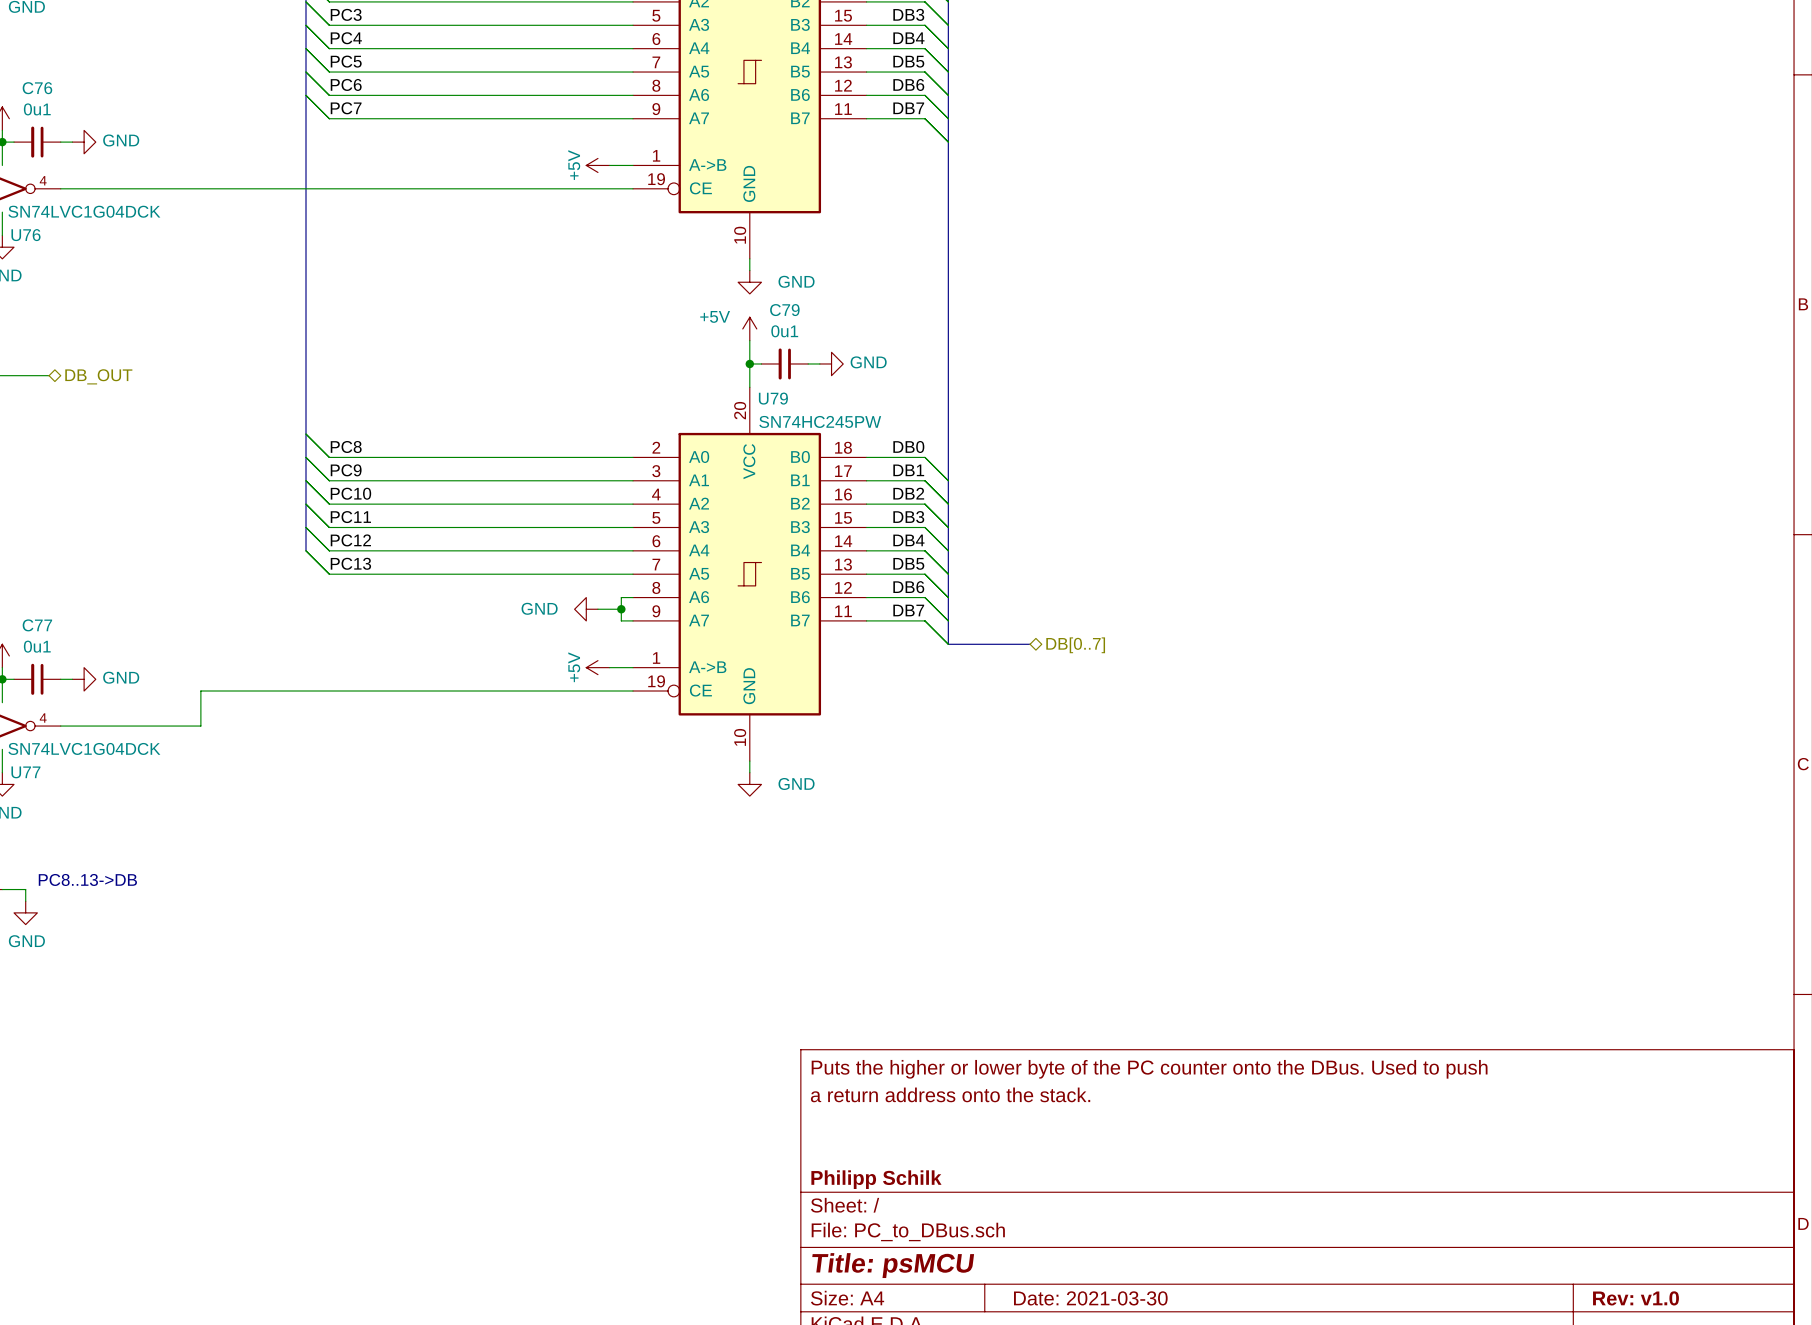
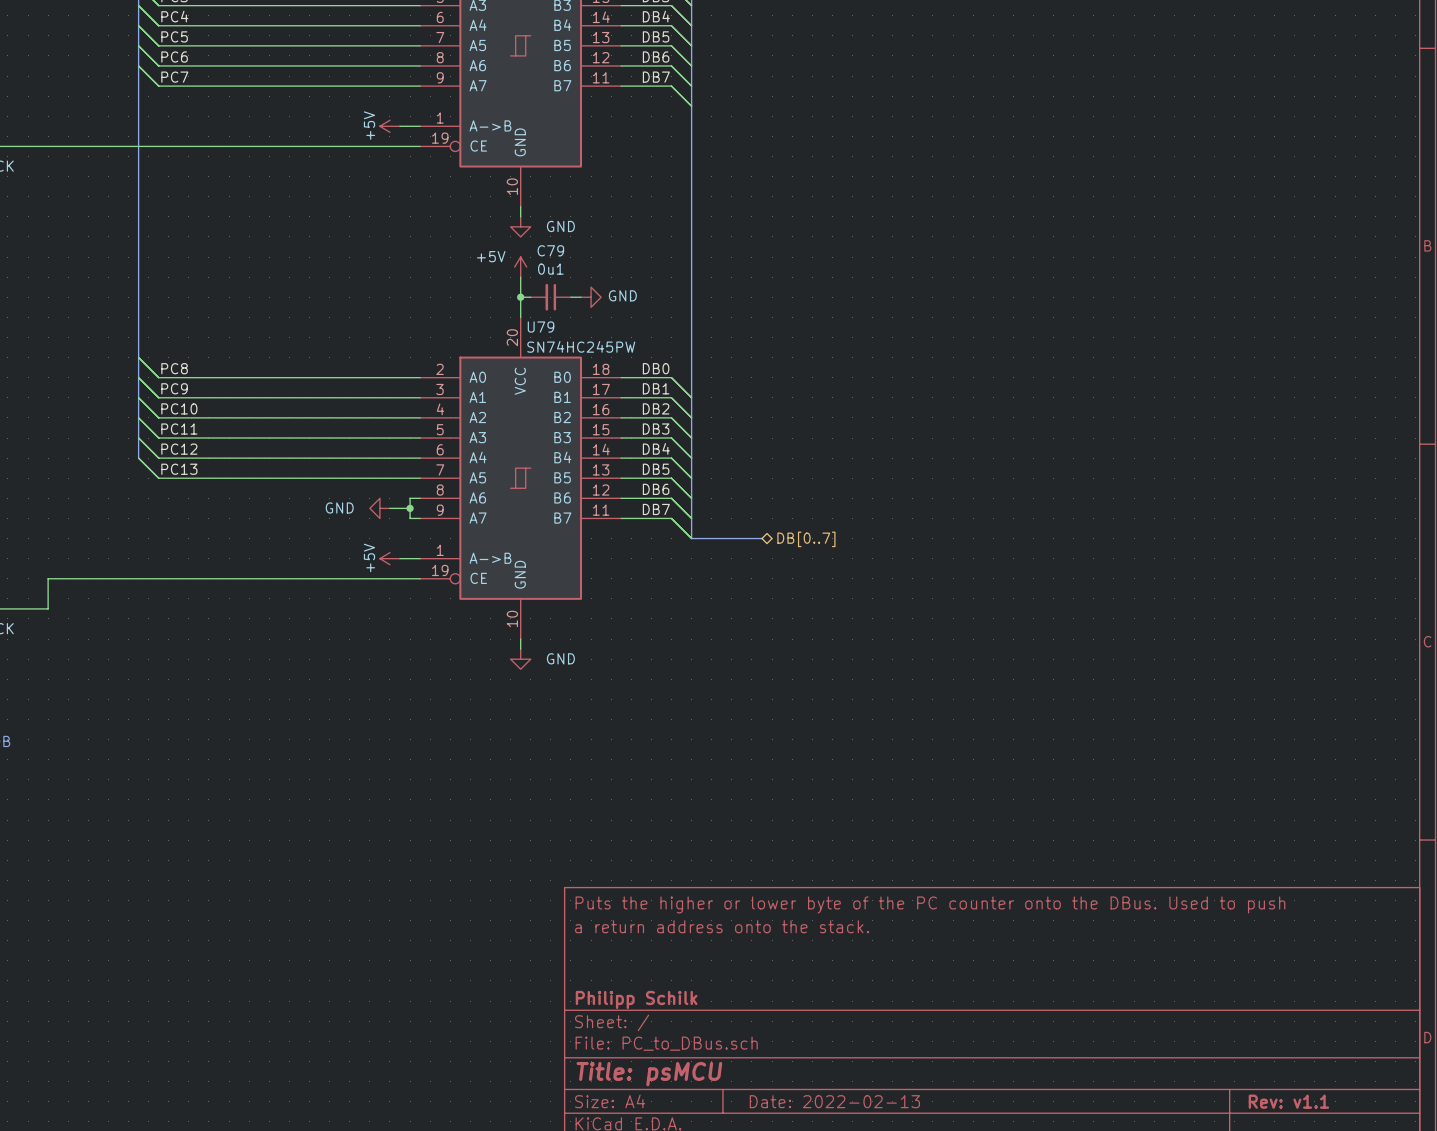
title block: Date: 2021-03-30 (1090, 1298) -> Date: 2022-02-13 (834, 1101)
title block: Rev: v1.0 (1635, 1298) -> Rev: v1.1 (1288, 1101)

